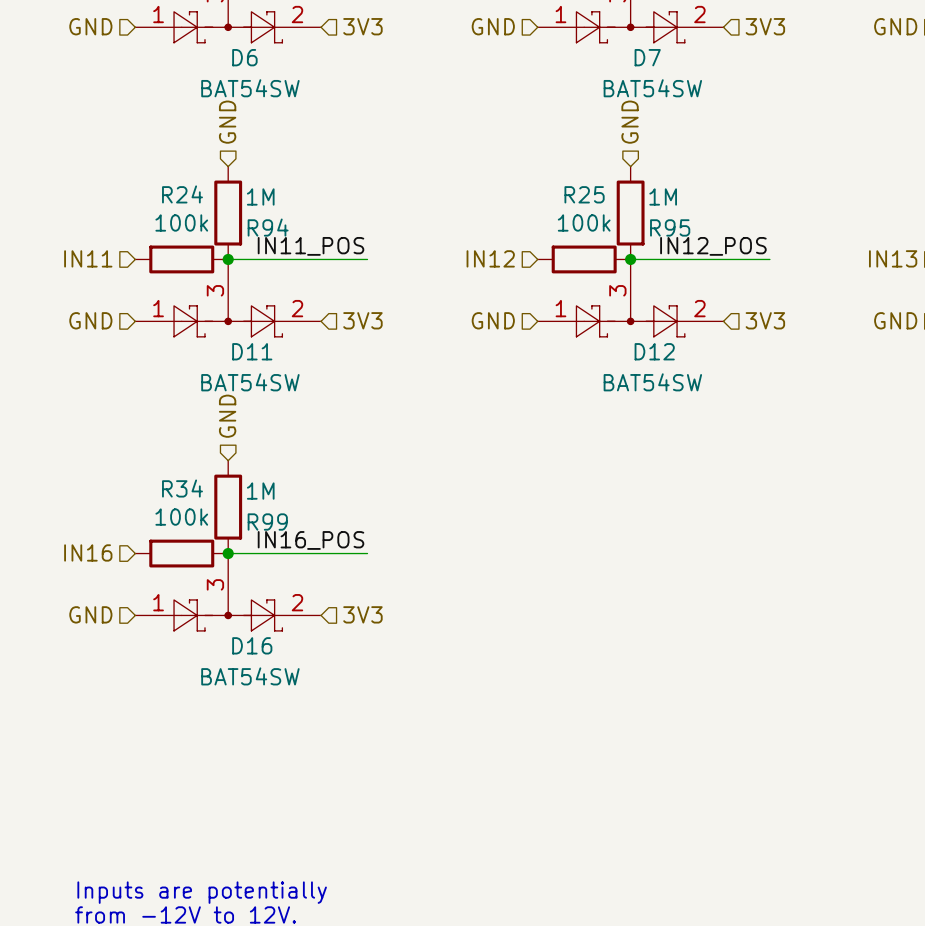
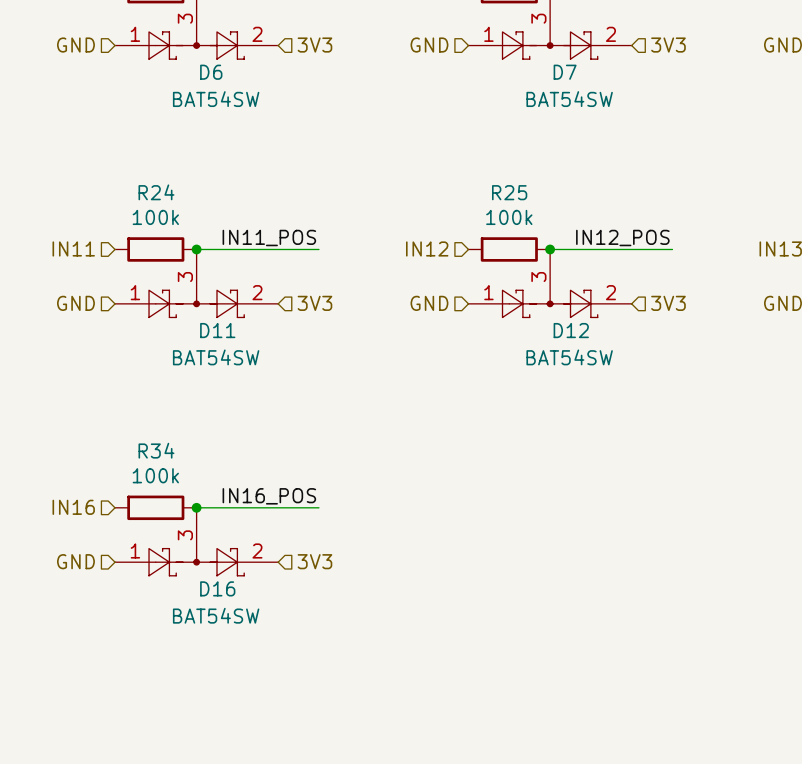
hierarchical label: GND (227, 122) -> none
hierarchical label: GND (630, 122) -> none
R94: 1M (228, 213) -> none
R95: 1M (630, 213) -> none
hierarchical label: GND (227, 416) -> none
R99: 1M (228, 507) -> none

